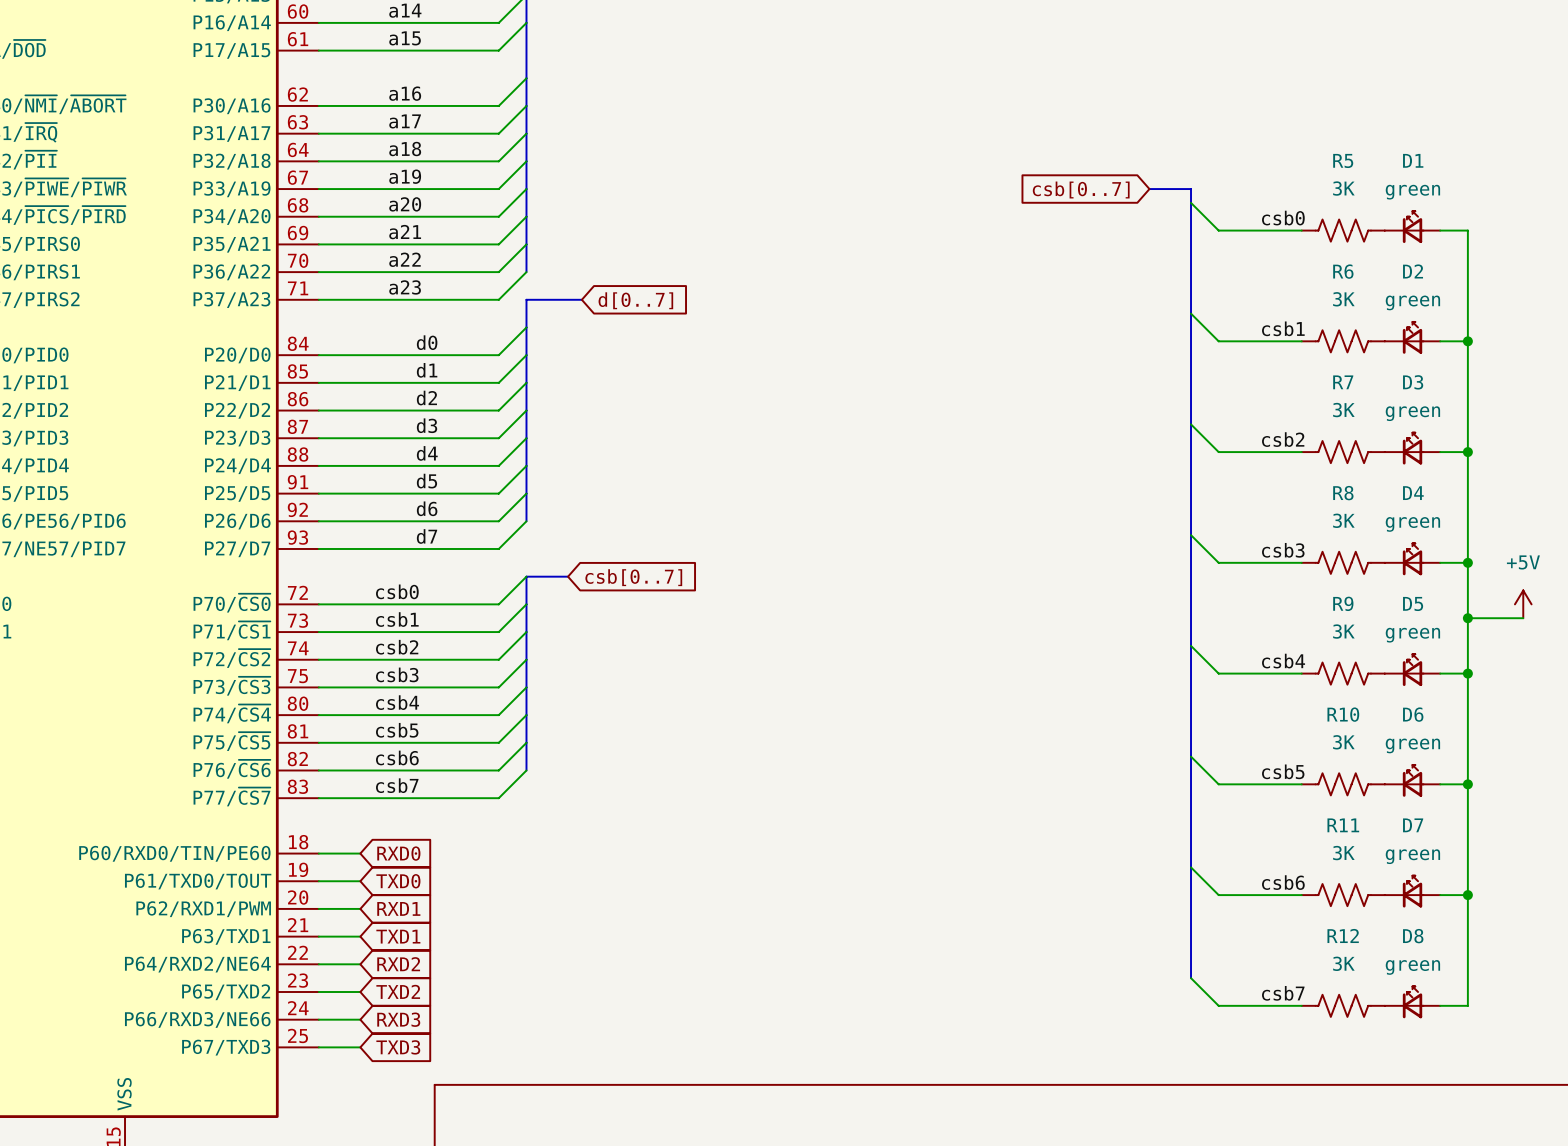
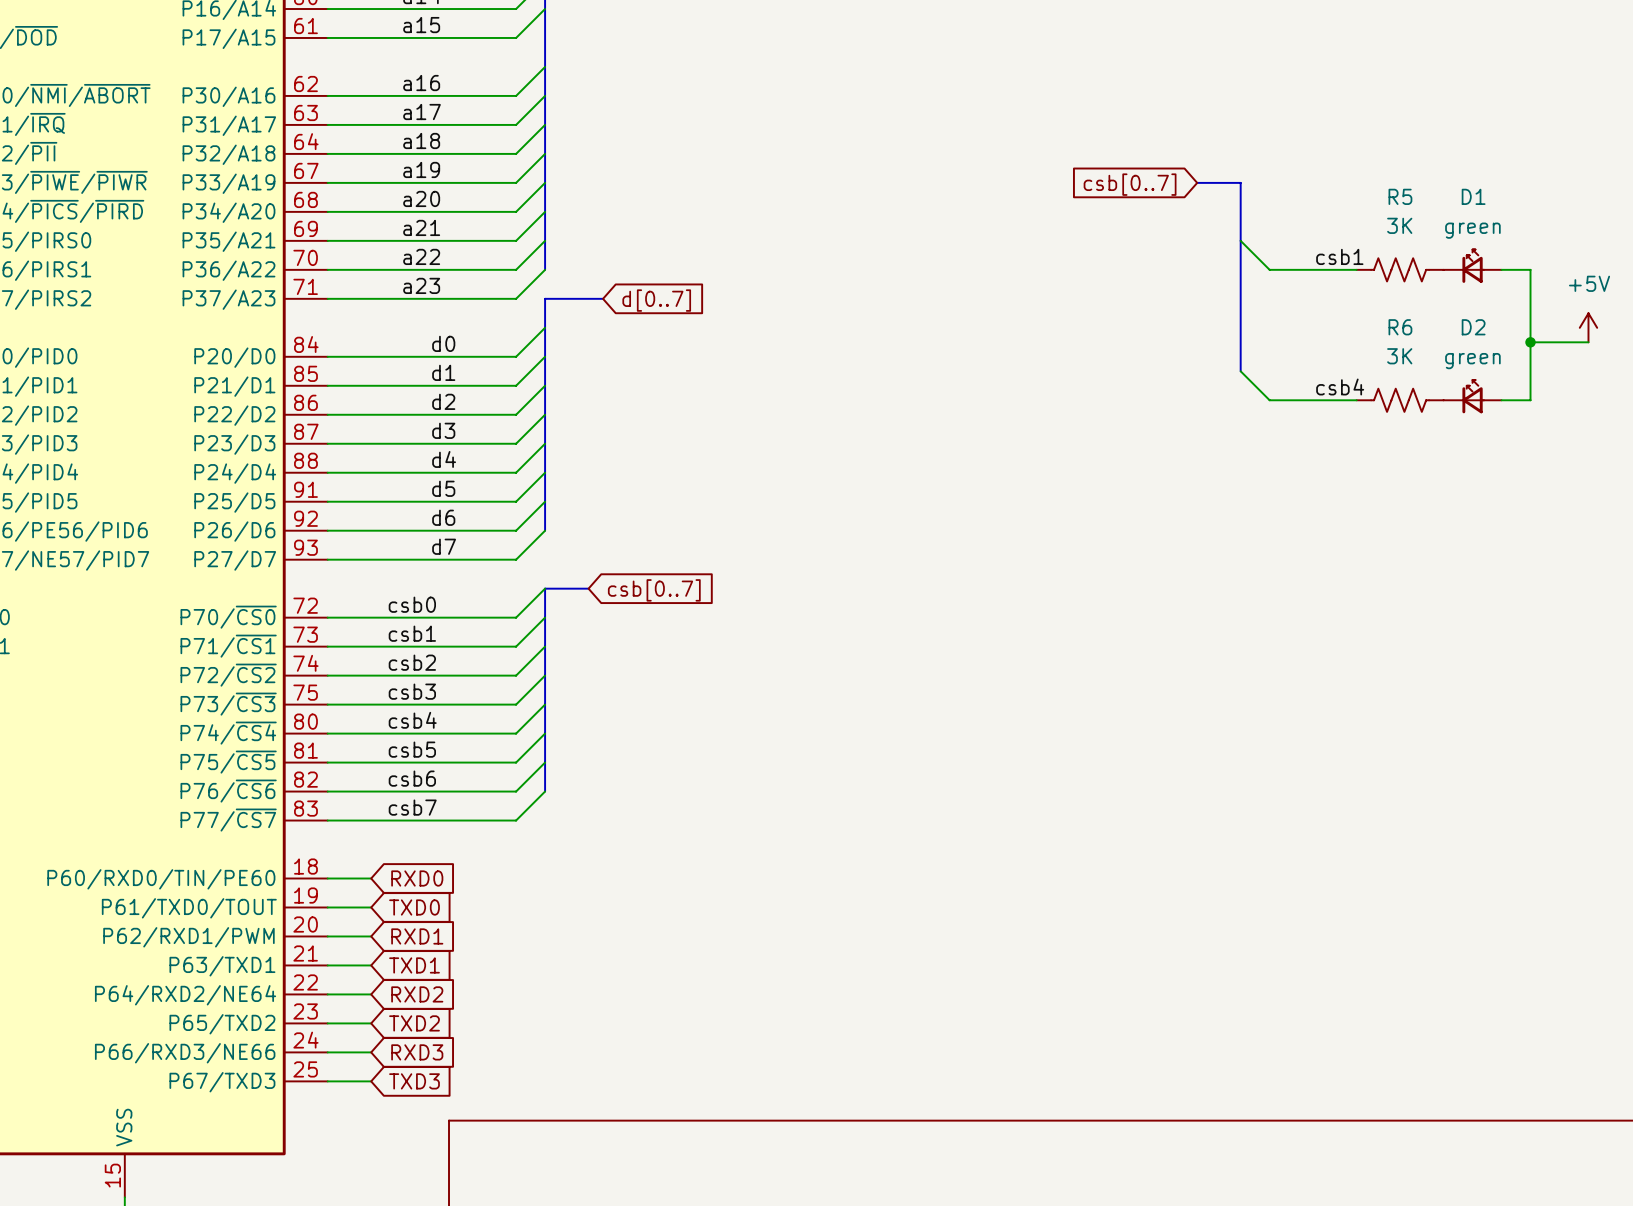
wire: (1191, 202) (1218, 230) (1301, 230) -> none
label: csb0 (1283, 218) -> none
D1 position: (1412, 227) -> (1472, 266)
R5 position: (1343, 230) -> (1400, 269)
wire: (1440, 230) (1467, 230) (1467, 272) -> (1501, 269) (1530, 269)
wire: (1191, 313) (1218, 341) (1301, 341) -> (1240, 371) (1269, 400) (1356, 400)
power symbol: none -> +5V (1588, 327)
label position: csb1 (1283, 328) -> csb1 (1339, 256)
D2 position: (1412, 337) -> (1472, 396)
R6 position: (1343, 341) -> (1400, 400)
wire: (1440, 341) (1467, 341) -> (1588, 342) (1530, 342)
bus: (1191, 369) (1191, 978) -> none
label: none -> csb4 (1340, 387)
wire: (1467, 396) (1467, 1005) (1440, 1005) -> (1530, 400) (1501, 400)
wire: (1191, 424) (1218, 452) (1301, 452) -> (1240, 240) (1269, 269) (1356, 269)
label: csb2 (1283, 439) -> none
D3: green (1412, 448) -> none
R7: 3K (1343, 452) -> none
wire: (1440, 452) (1467, 452) -> none
junction: (1467, 452) -> none
wire: (1191, 535) (1218, 562) (1301, 562) -> none
label: csb3 (1283, 550) -> none
D4: green (1412, 559) -> none
R8: 3K (1343, 562) -> none
wire: (1440, 562) (1467, 562) -> none
junction: (1467, 562) -> none
power symbol: +5V (1523, 604) -> none
wire: (1467, 618) (1523, 618) -> none
junction: (1467, 618) -> none
wire: (1191, 645) (1218, 673) (1301, 673) -> none
label: csb4 (1283, 661) -> none
D5: green (1412, 670) -> none
R9: 3K (1343, 673) -> none
wire: (1440, 673) (1467, 673) -> none
junction: (1467, 673) -> none
wire: (1191, 756) (1218, 784) (1301, 784) -> none
label: csb5 (1283, 771) -> none
D6: green (1412, 780) -> none
R10: 3K (1343, 784) -> none
wire: (1440, 784) (1467, 784) -> none
junction: (1467, 784) -> none
wire: (1191, 867) (1218, 895) (1301, 895) -> none
label: csb6 (1283, 882) -> none
D7: green (1412, 891) -> none
R11: 3K (1343, 895) -> none
wire: (1440, 895) (1467, 895) -> none
junction: (1467, 895) -> none
wire: (1191, 978) (1218, 1005) (1301, 1005) -> none
label: csb7 (1283, 993) -> none
D8: green (1412, 1002) -> none
R12: 3K (1343, 1005) -> none

